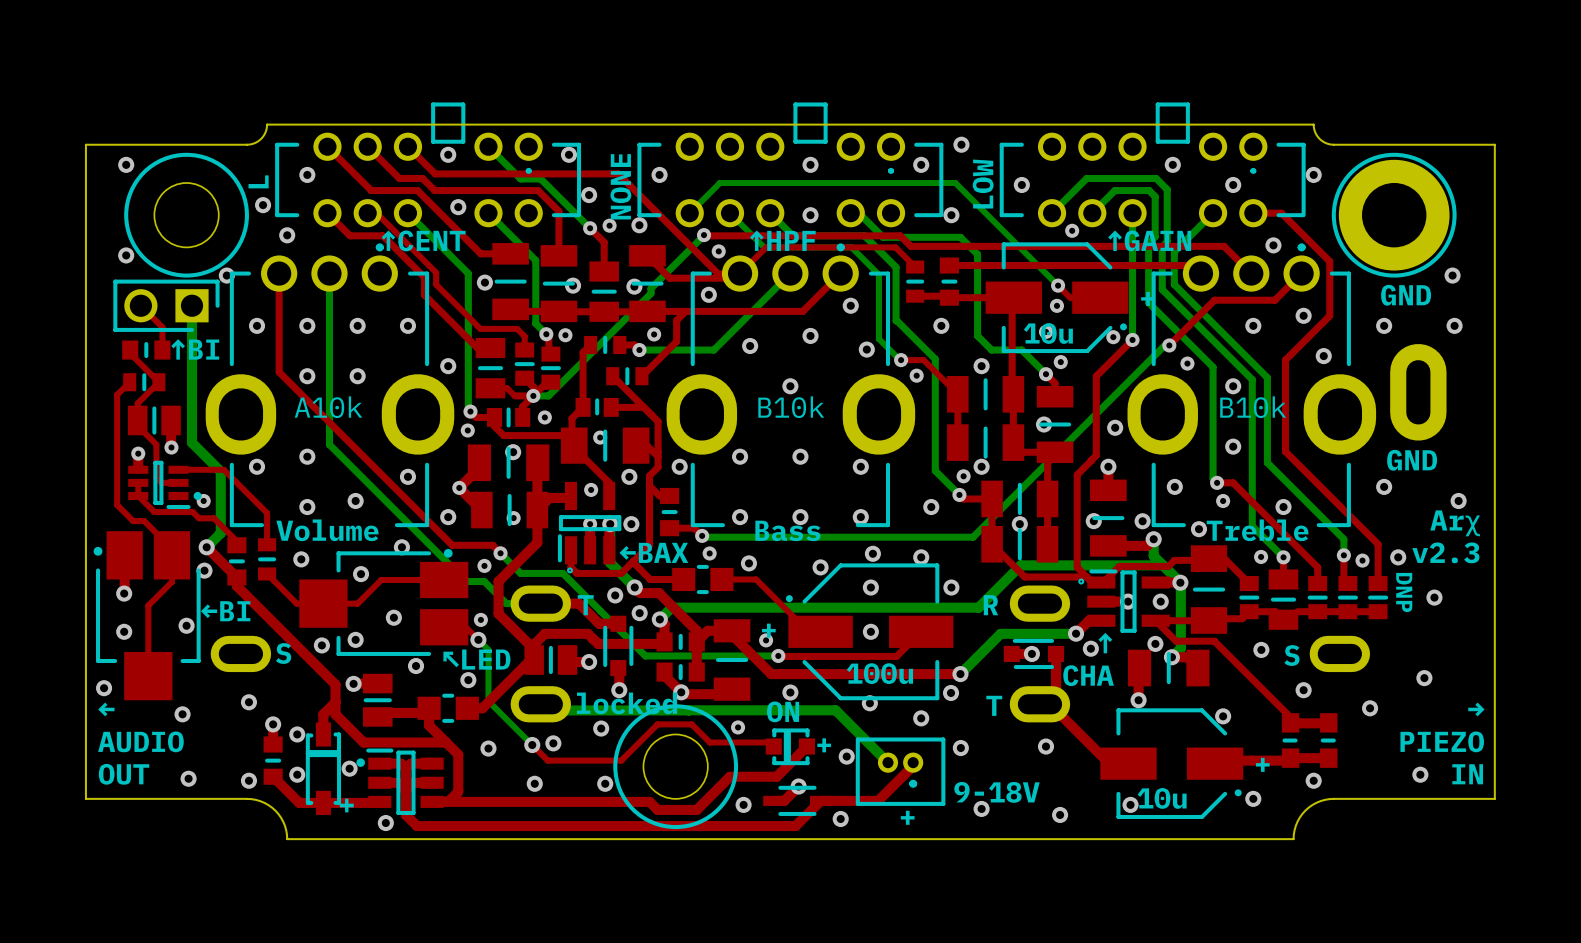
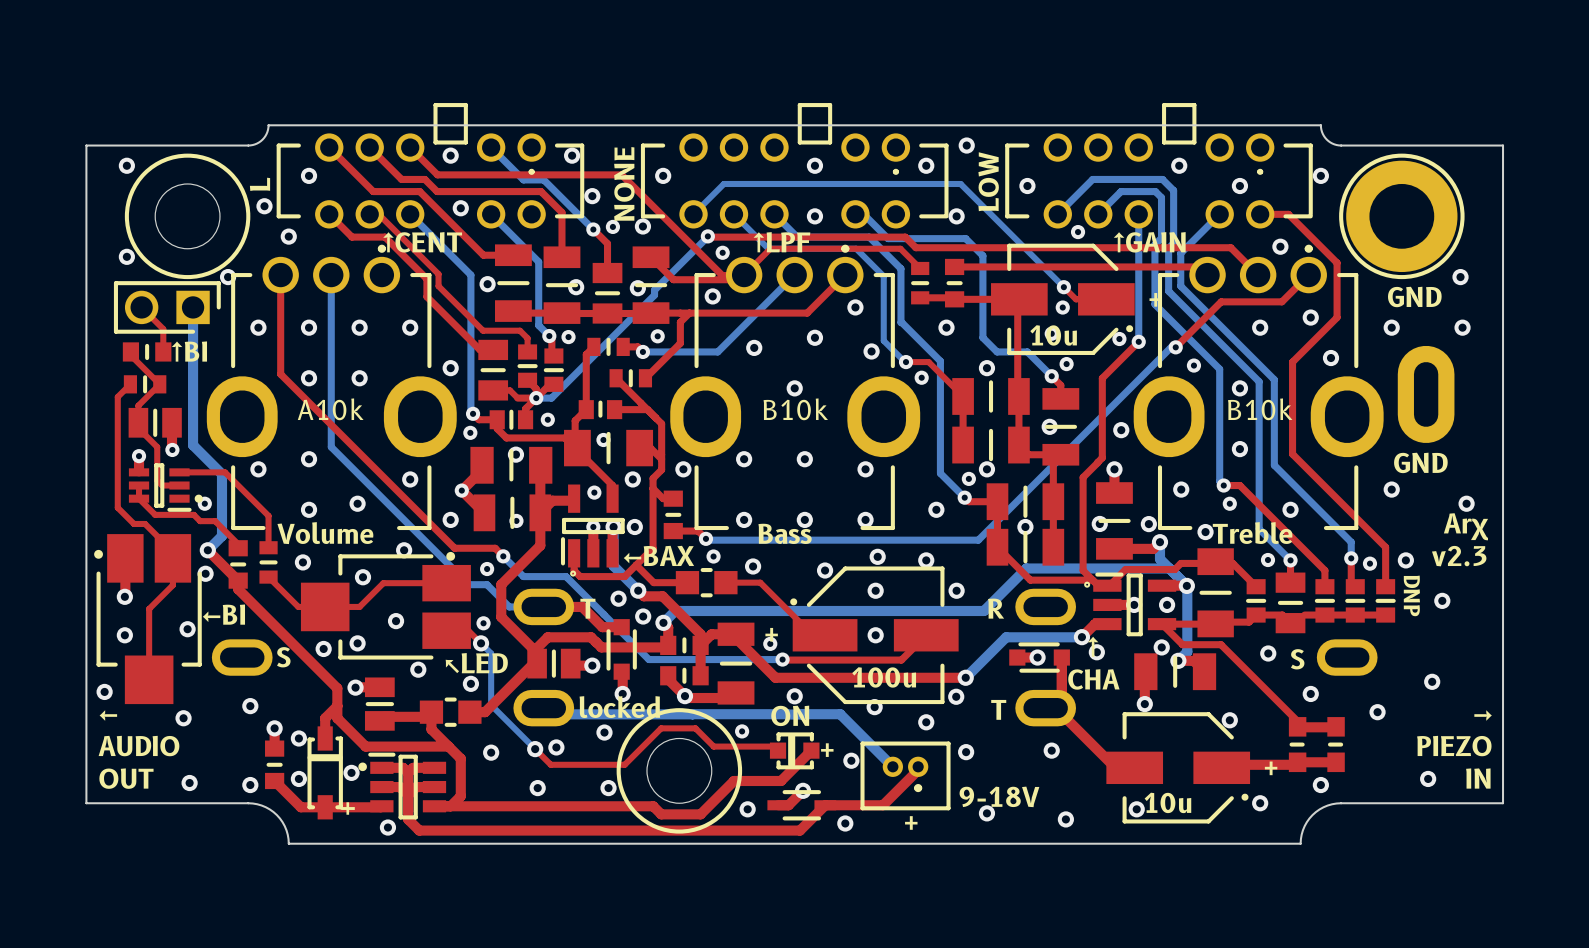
text: ↑HPF (782, 240) -> ↑LPF (781, 242)

